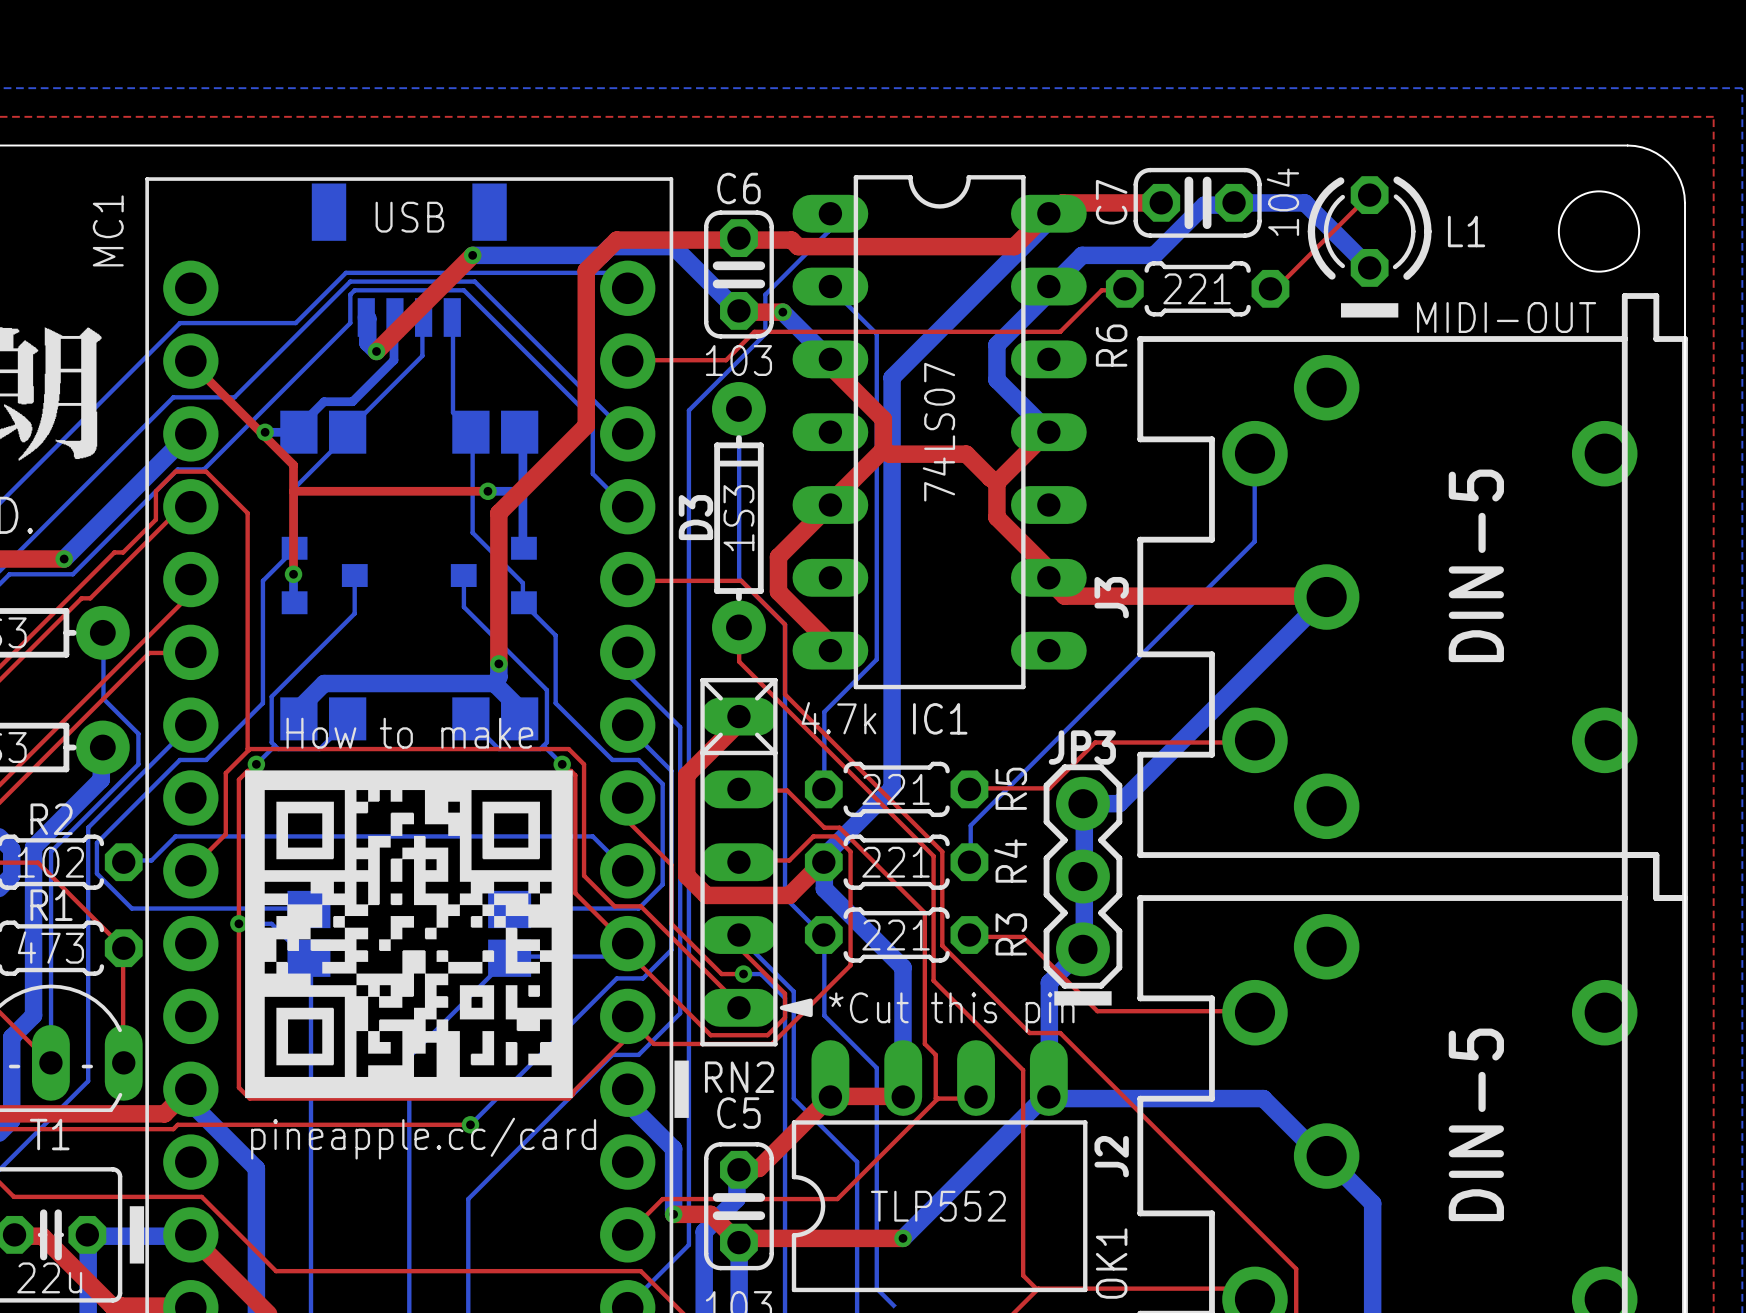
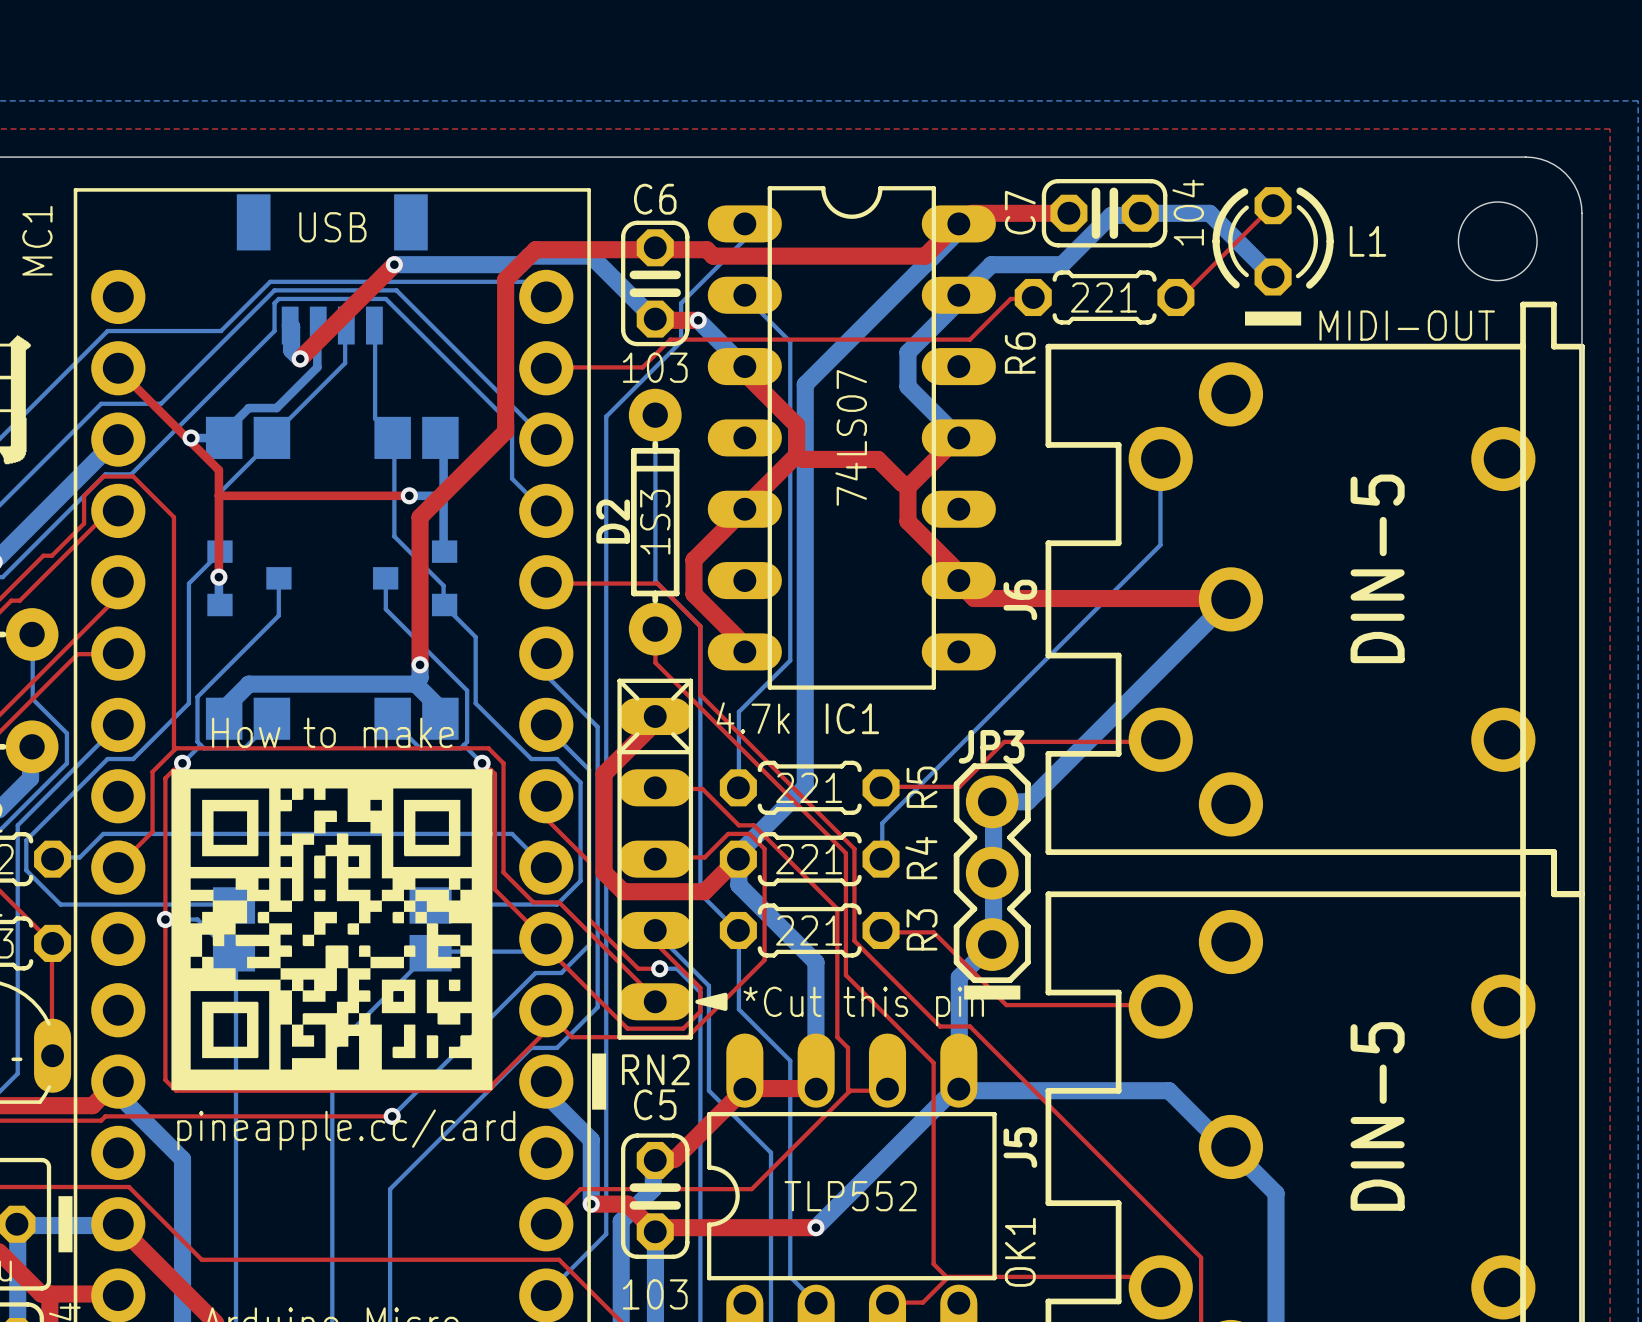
D3 name: D3 (695, 517) -> D2 (613, 521)
J3 name: J3 (1111, 597) -> J6 (1020, 599)
J2 name: J2 (1111, 1156) -> J5 (1020, 1147)

